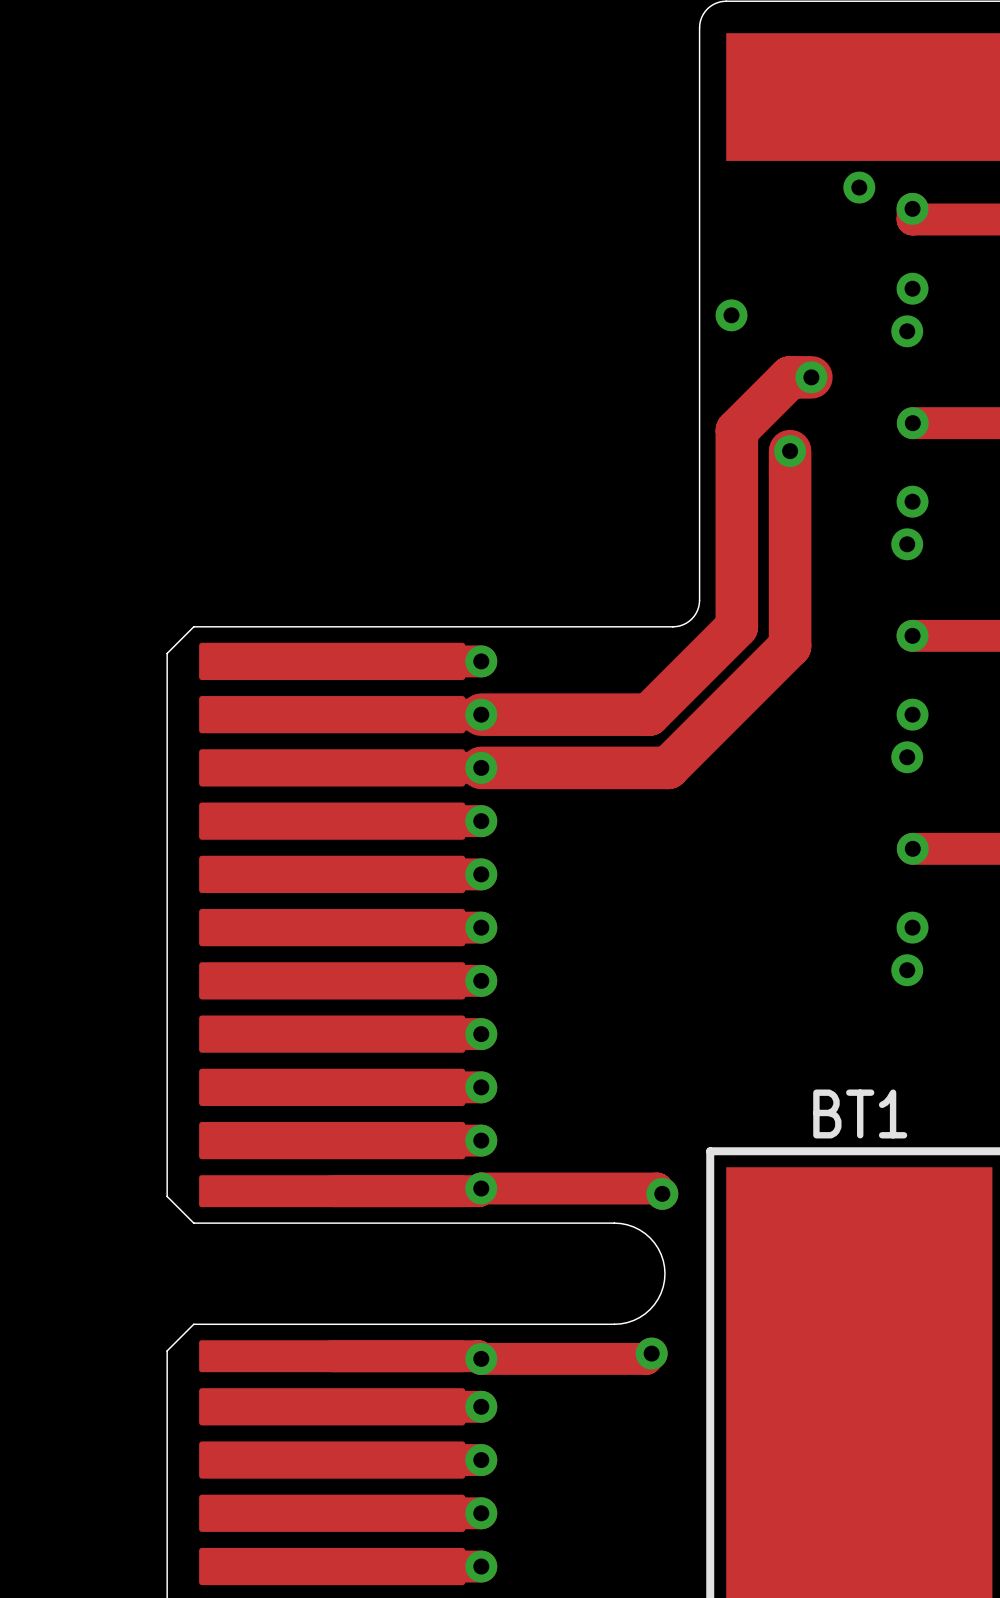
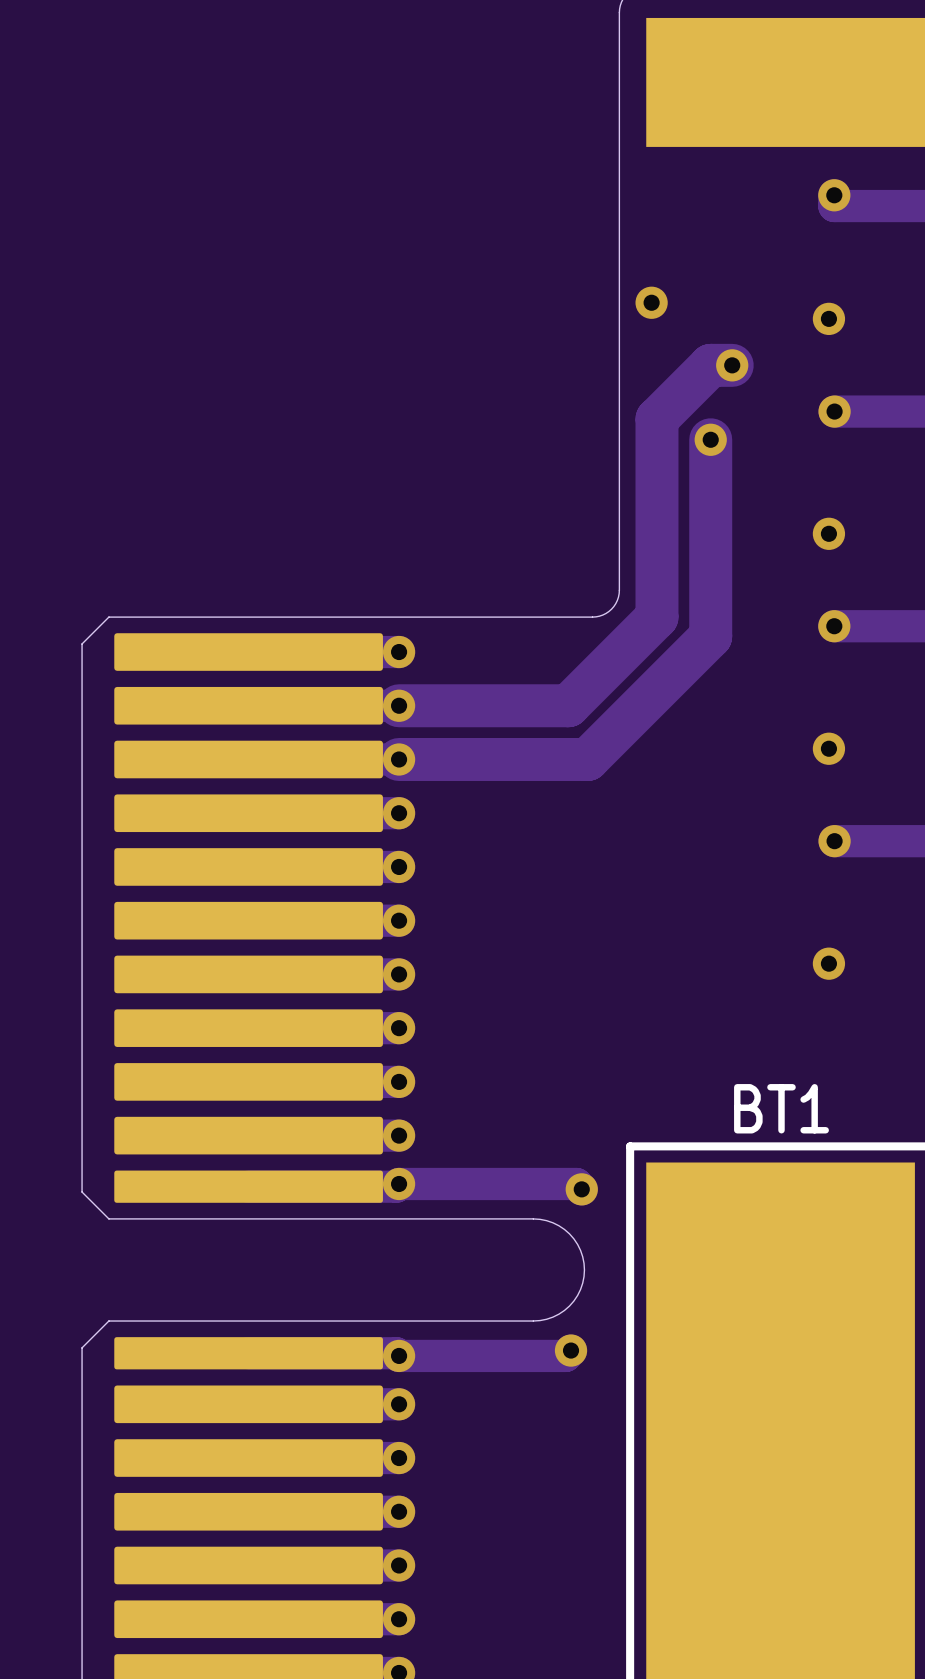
via: (859, 187) -> none
via: (912, 288) -> none
via: (912, 501) -> none
via: (912, 714) -> none
via: (912, 927) -> none

